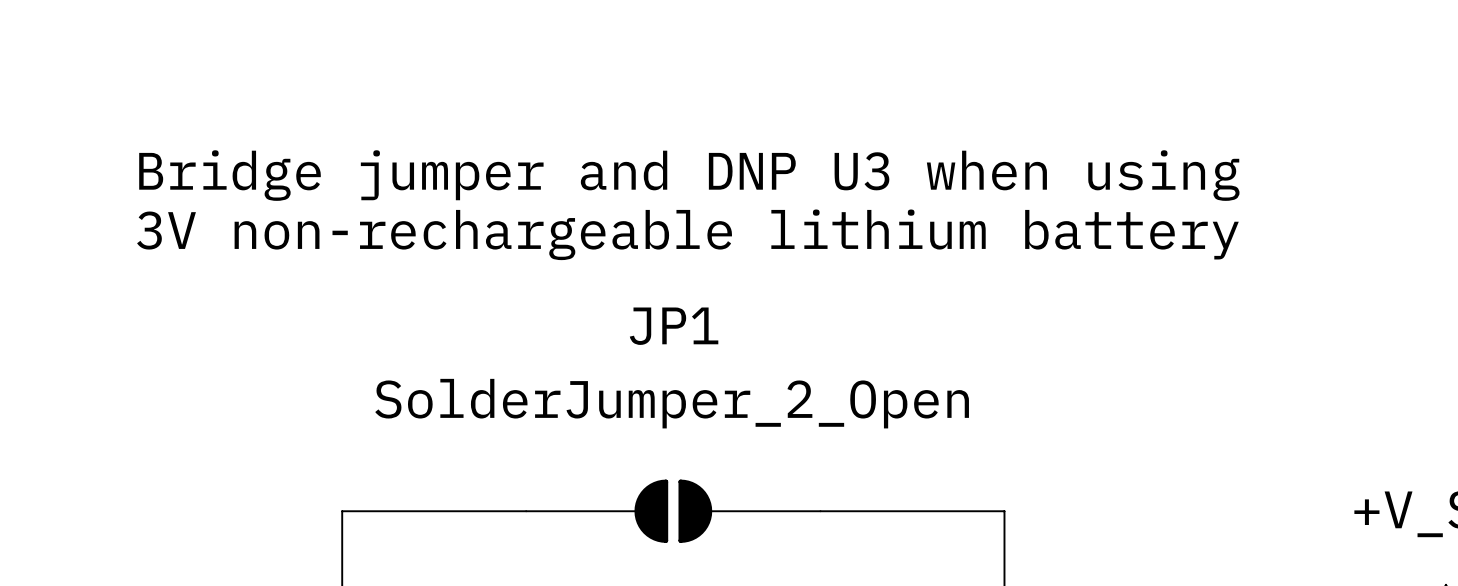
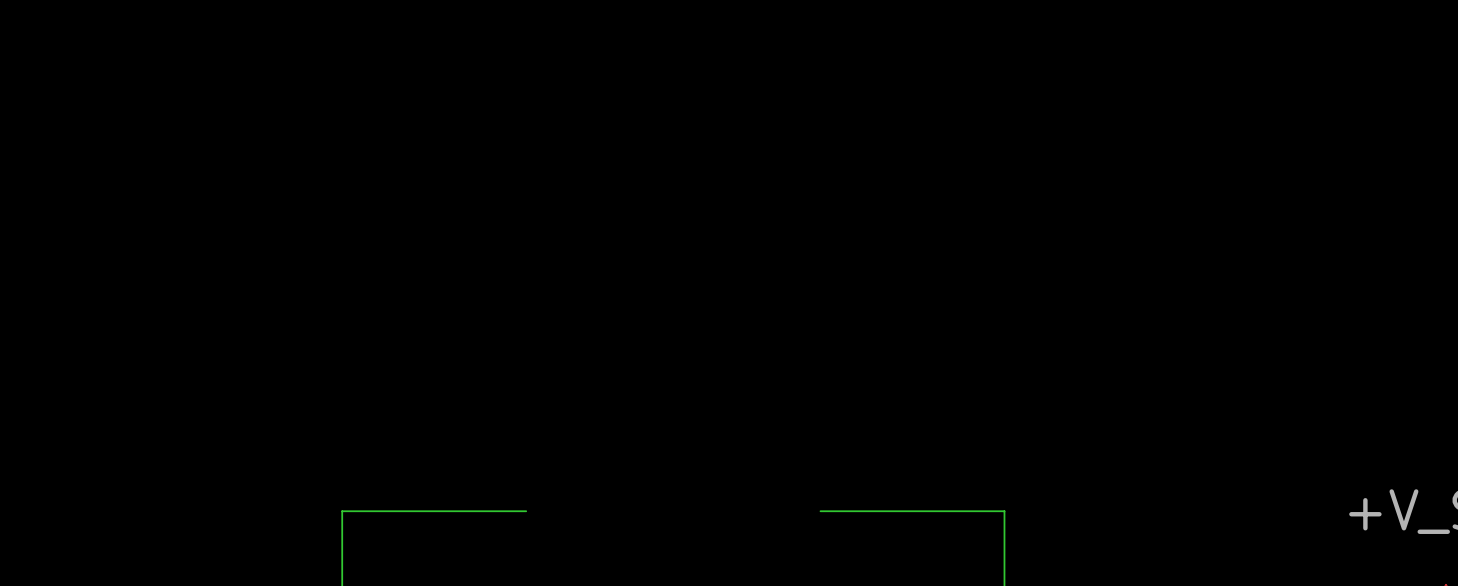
text: Bridge jumper and DNP U3 when using (689, 175) -> none
text: 3V non-rechargeable lithium battery (687, 234) -> none
JP1: SolderJumper_2_Open (673, 511) -> none

